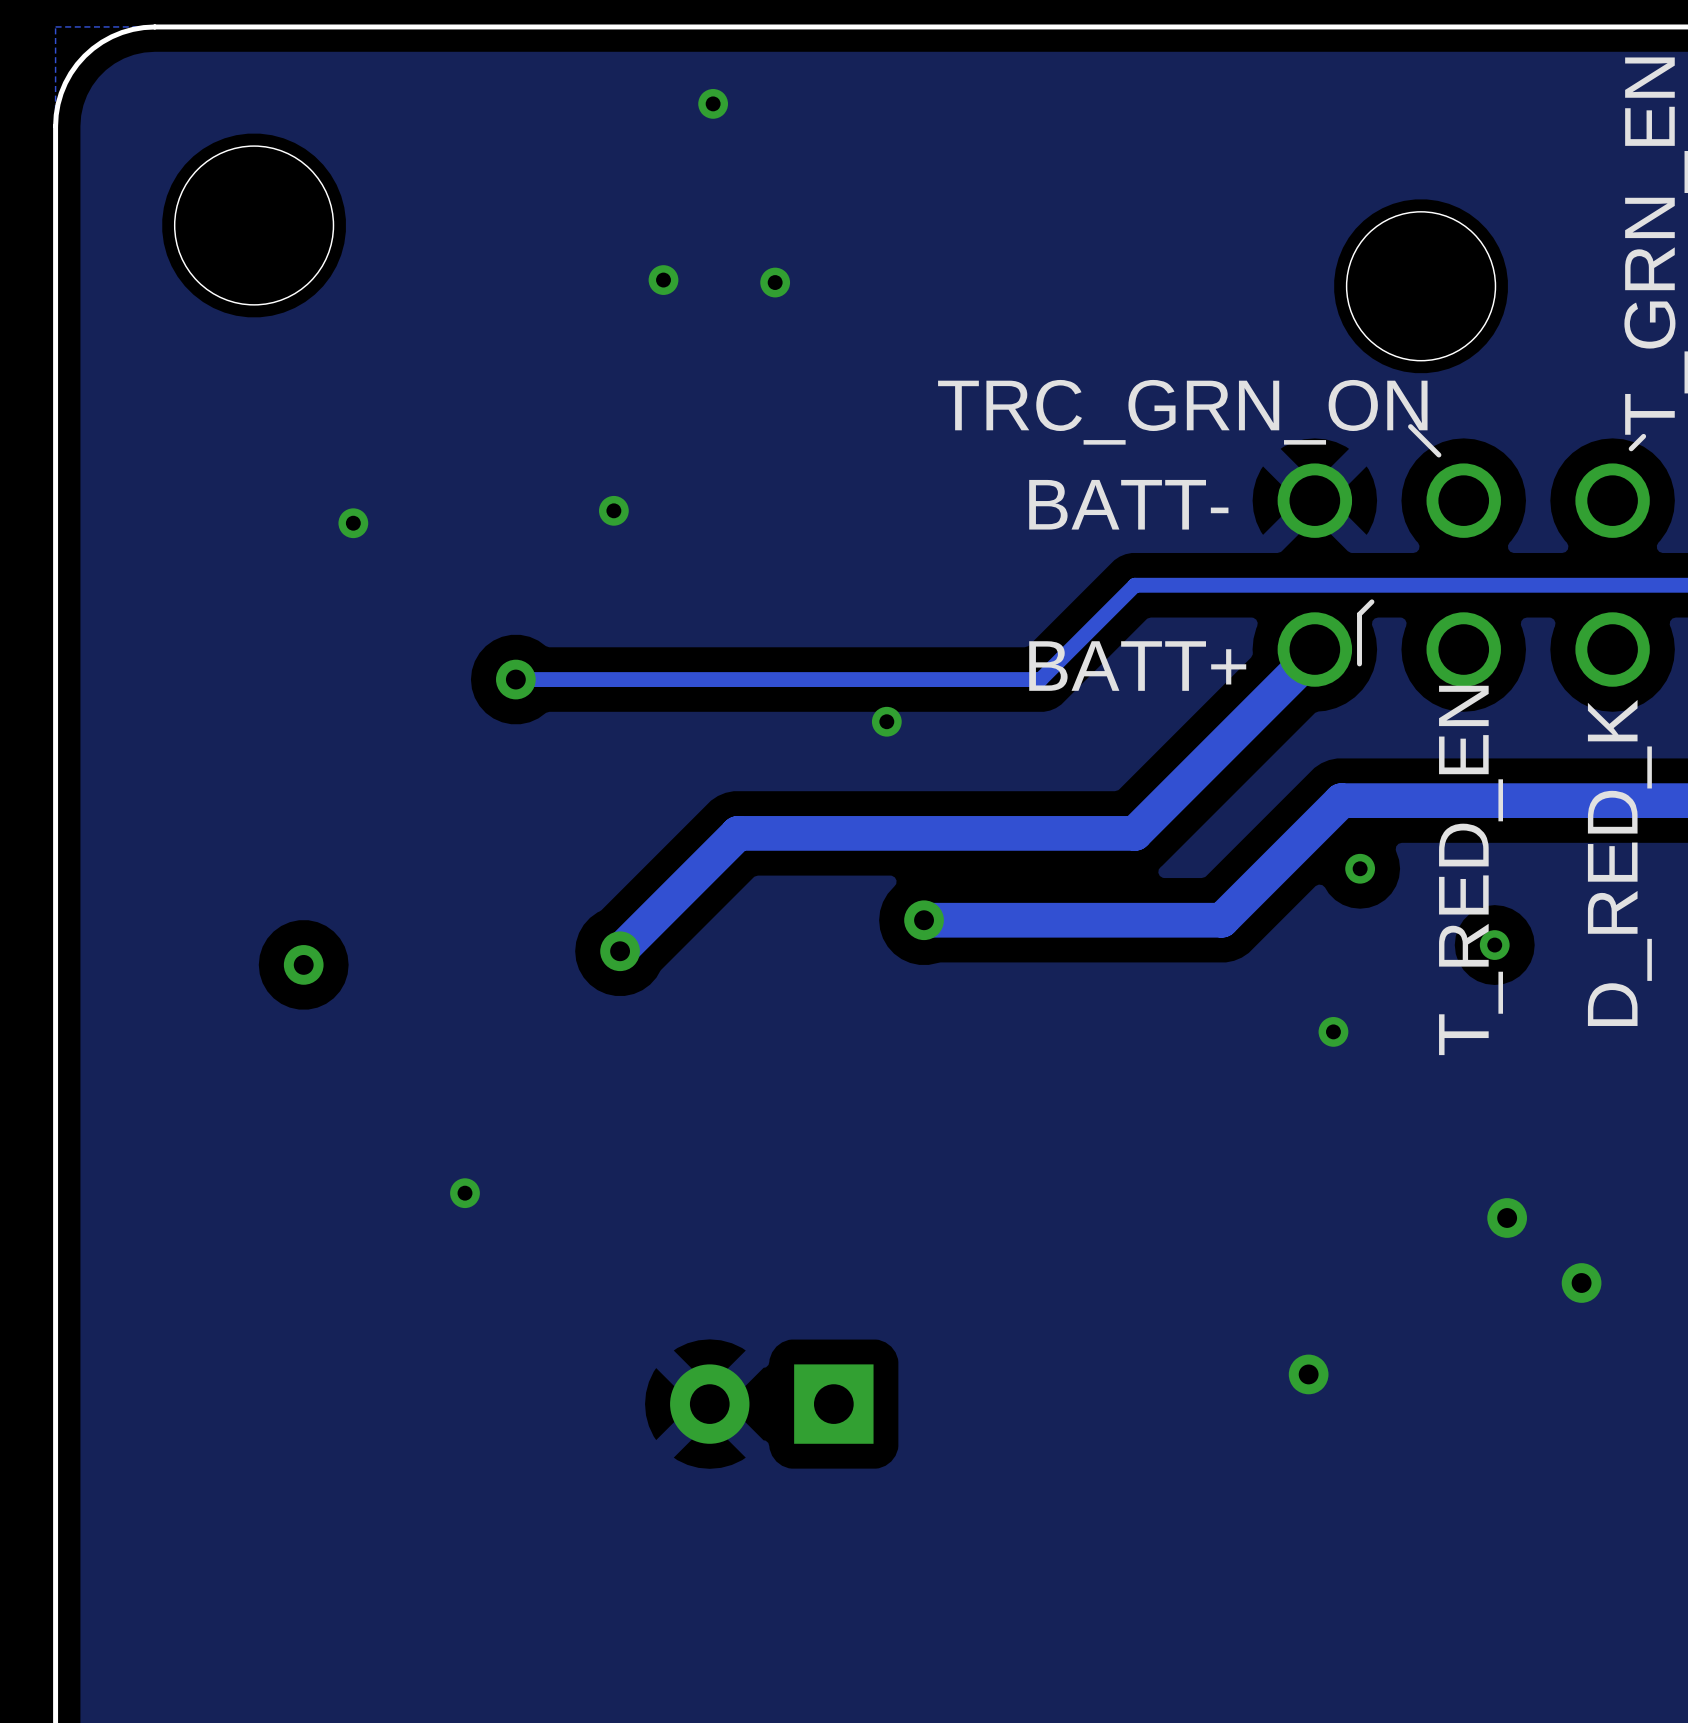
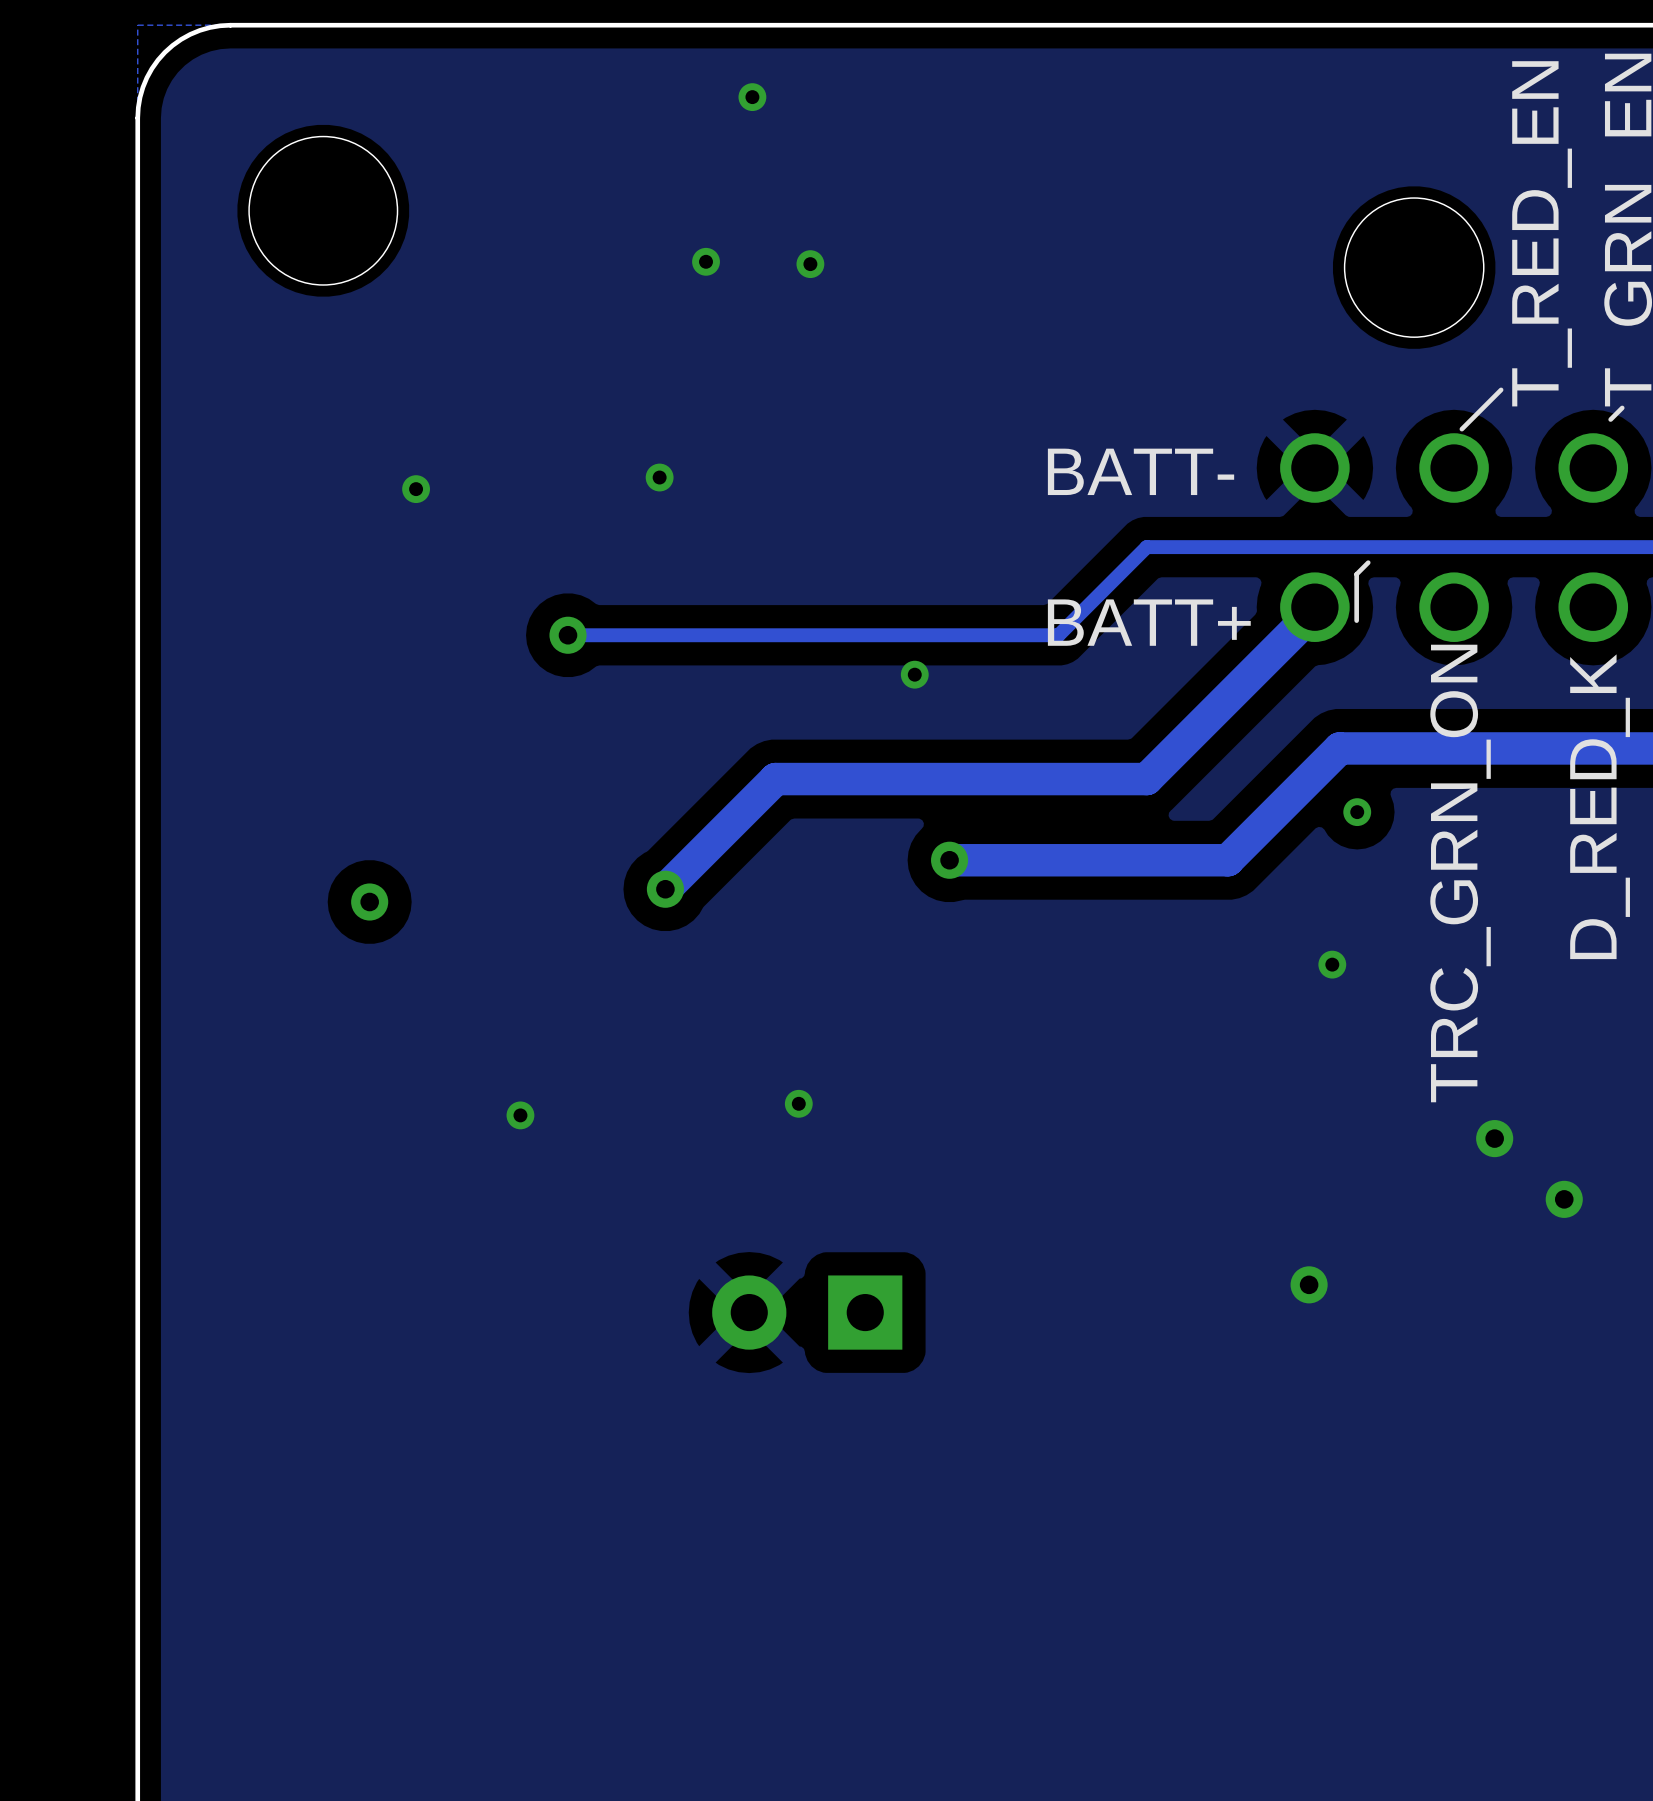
text rotation: 0° (1182, 412) -> 90° counterclockwise (1460, 873)
text position: TRC_GRN_ON (1182, 412) -> TRC_GRN_ON (1460, 873)
line: none -> (1501, 389) (1461, 429)
line: (1410, 426) (1438, 454) -> none
text position: T_RED_EN (1471, 870) -> T_RED_EN (1542, 233)
via: (1494, 945) -> none
via: none -> (798, 1103)

